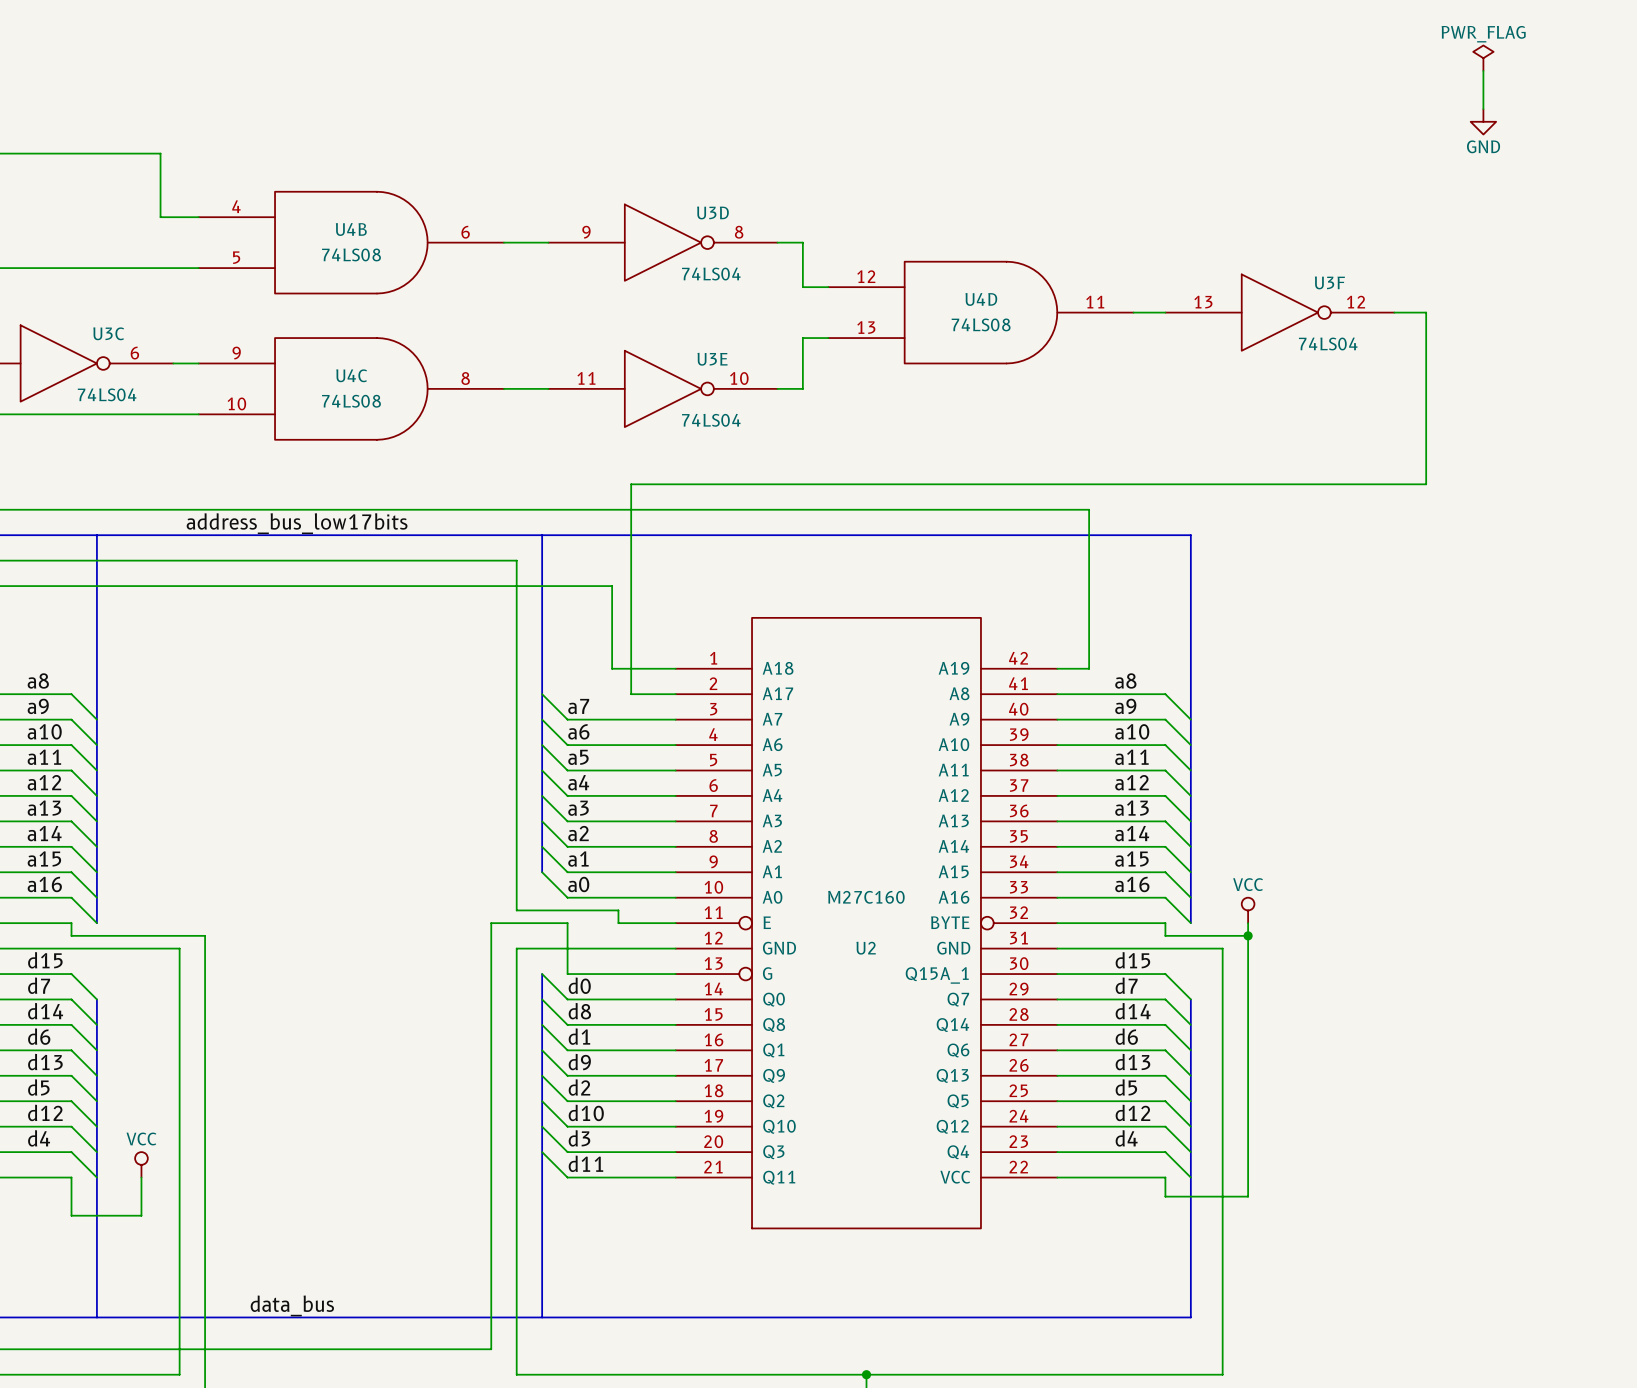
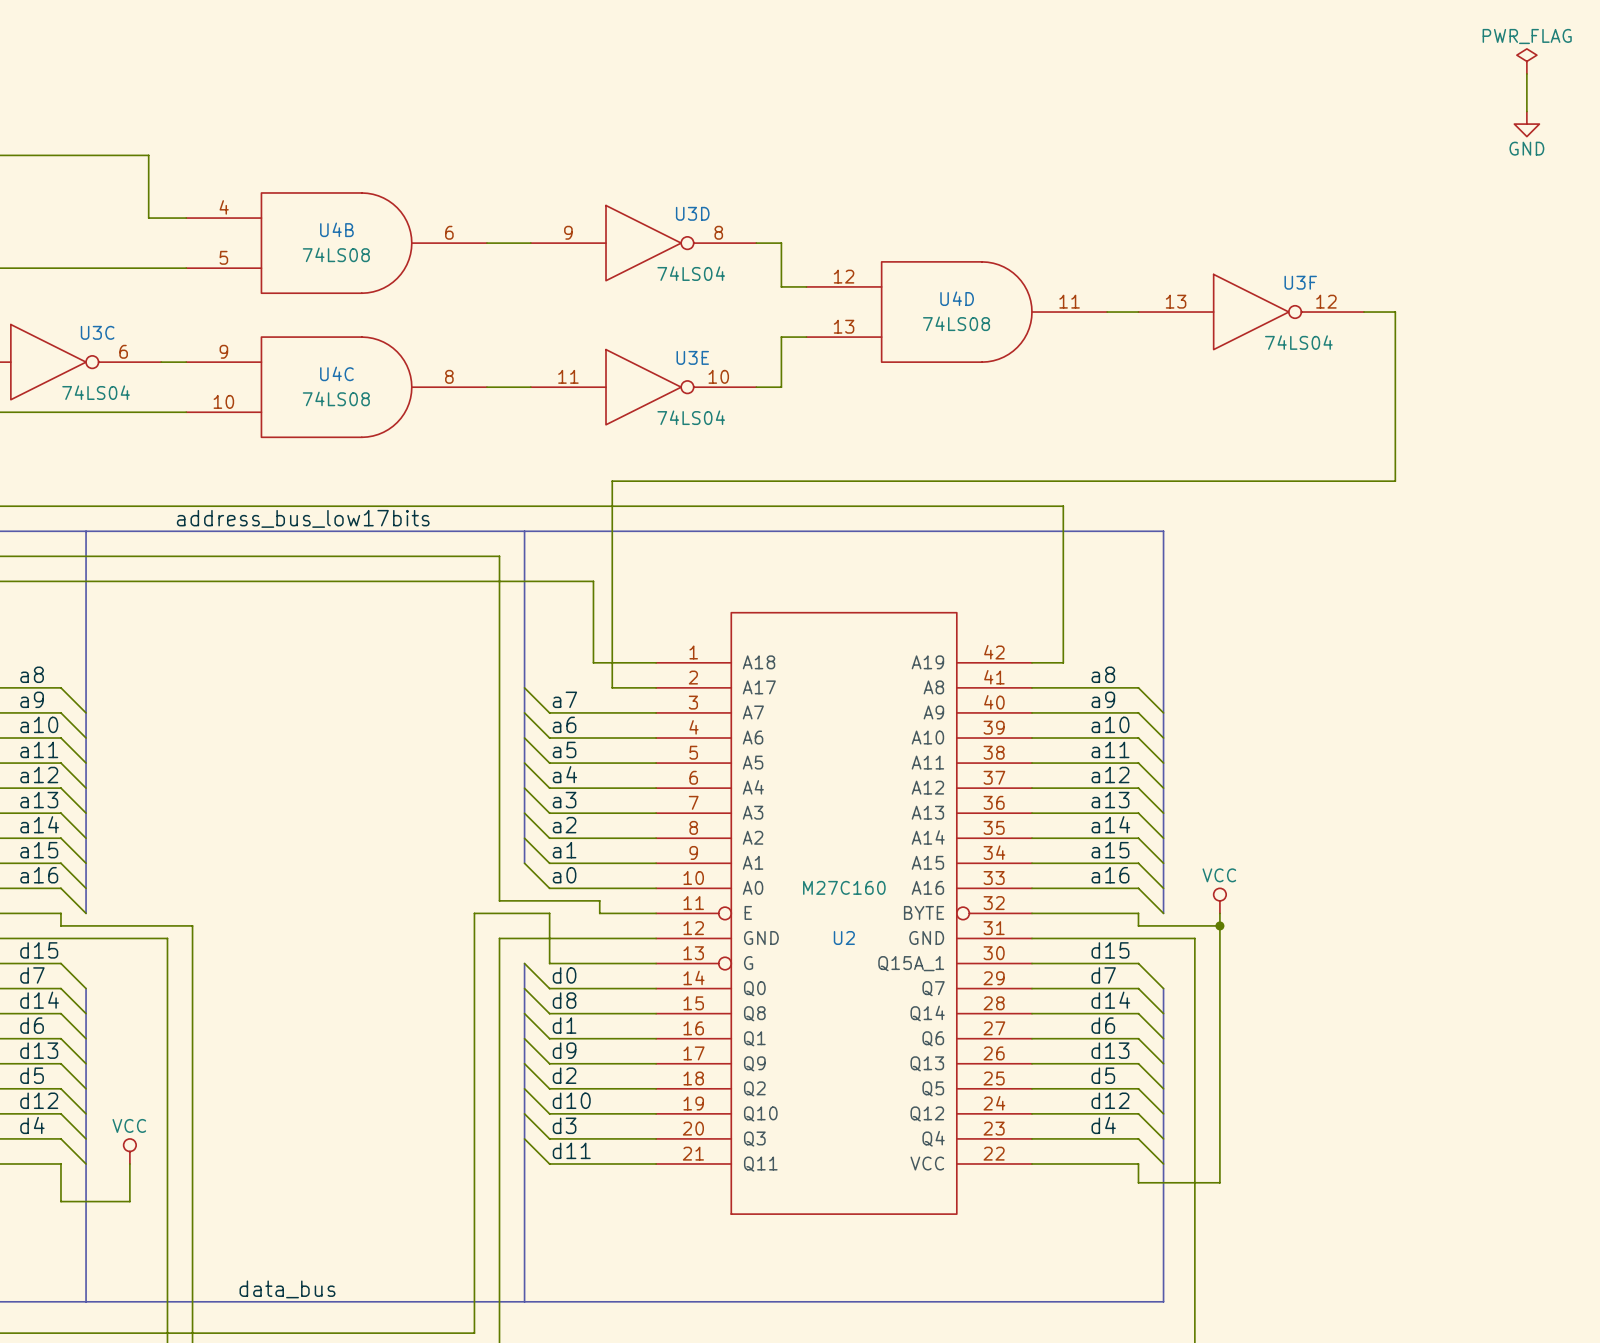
power symbol position: PWR_FLAG (1483, 58) -> PWR_FLAG (1526, 61)
wire: (1483, 70) (1483, 109) -> (1526, 73) (1526, 111)
power symbol position: GND (1483, 121) -> GND (1526, 124)

